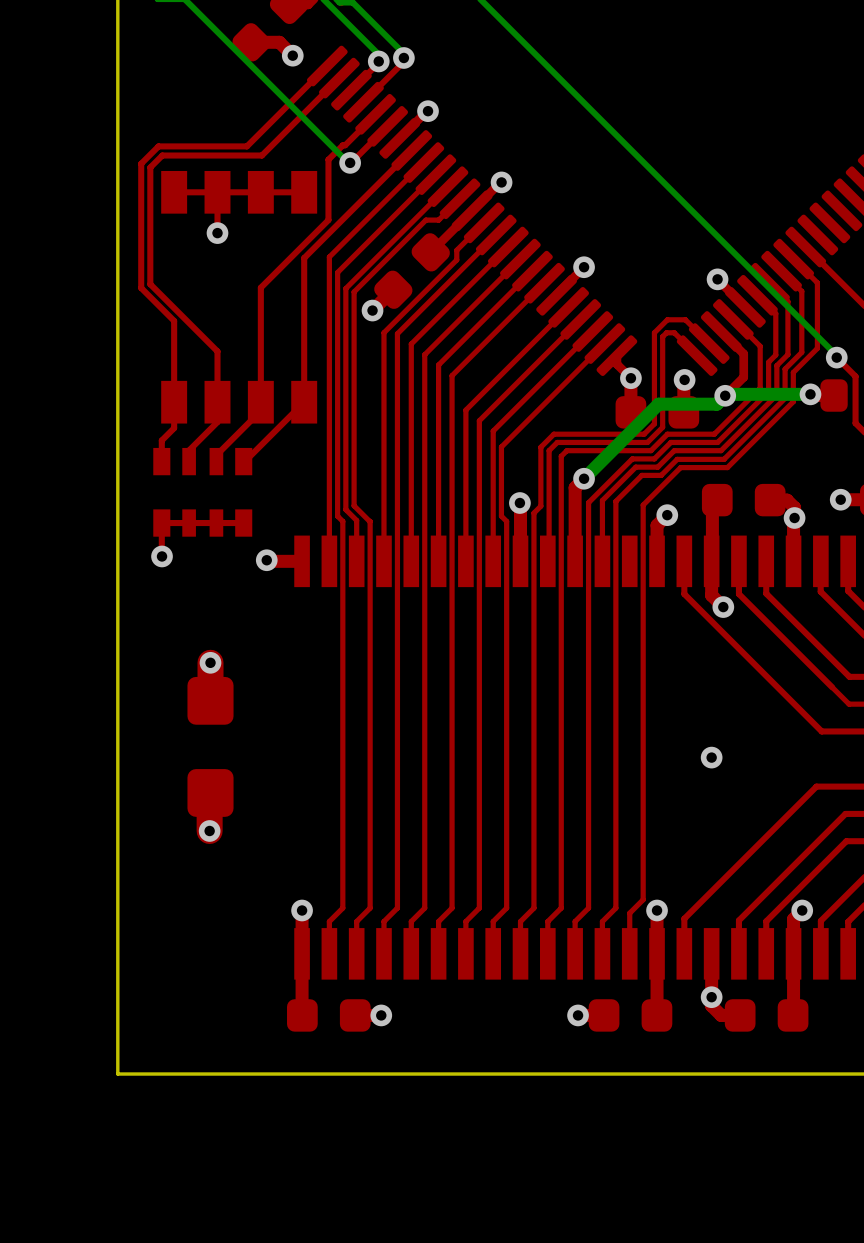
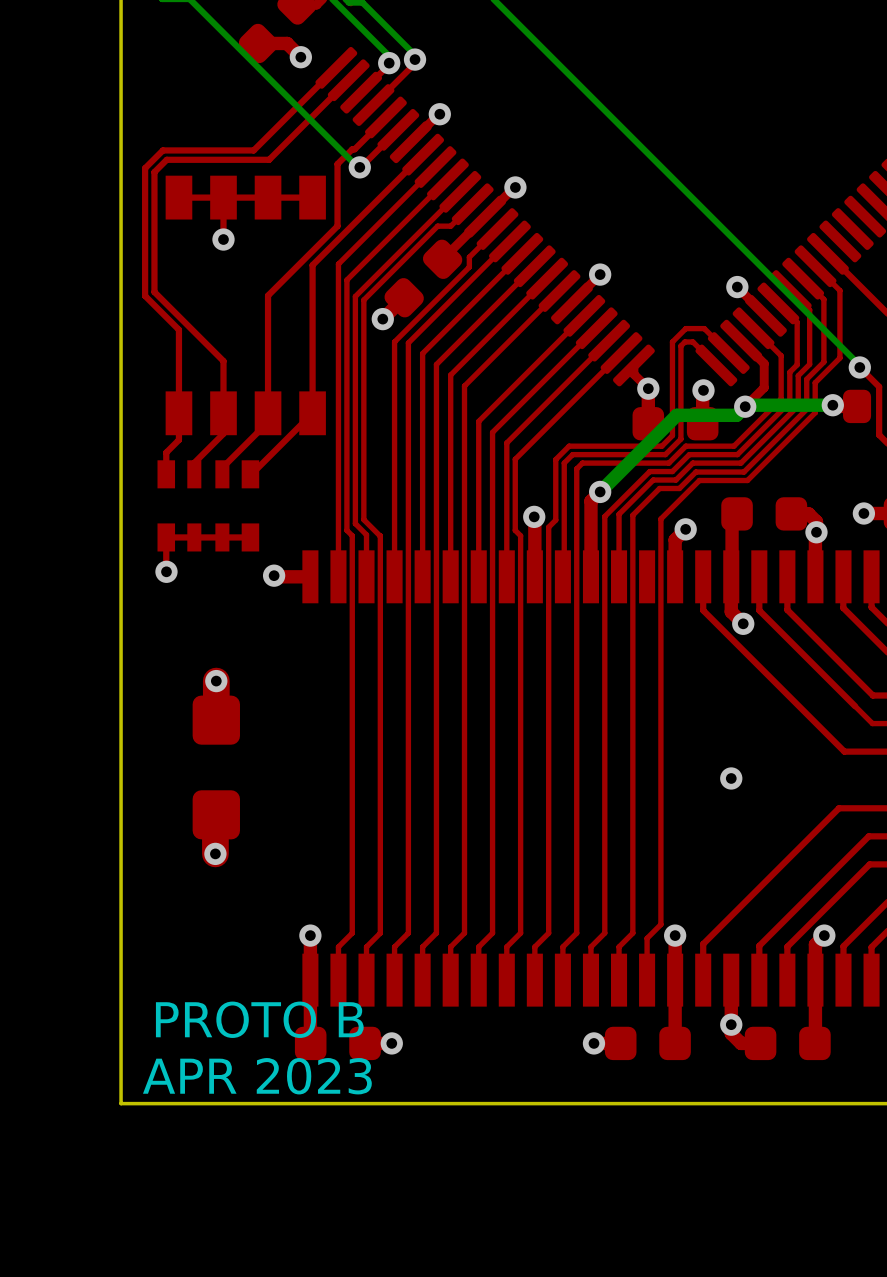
text: none -> PROTO B (259, 1019)
text: none -> APR 2023 (257, 1076)

